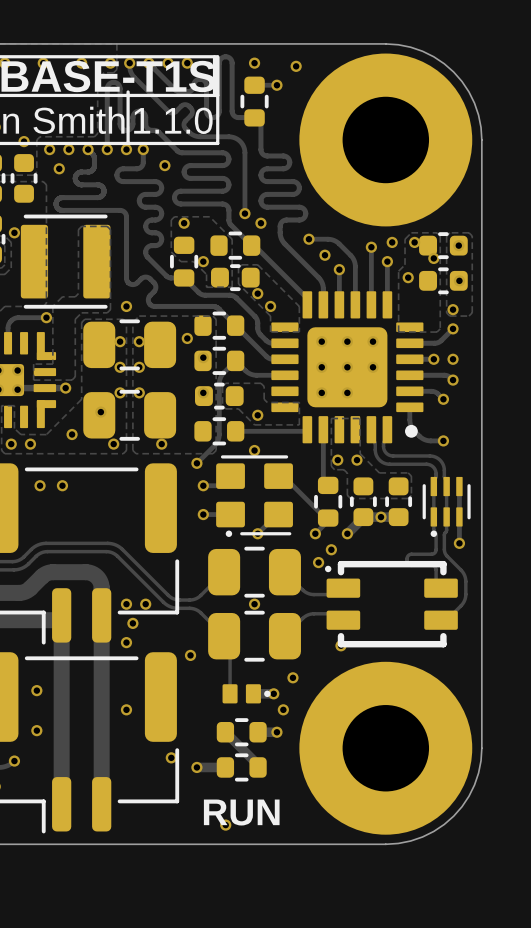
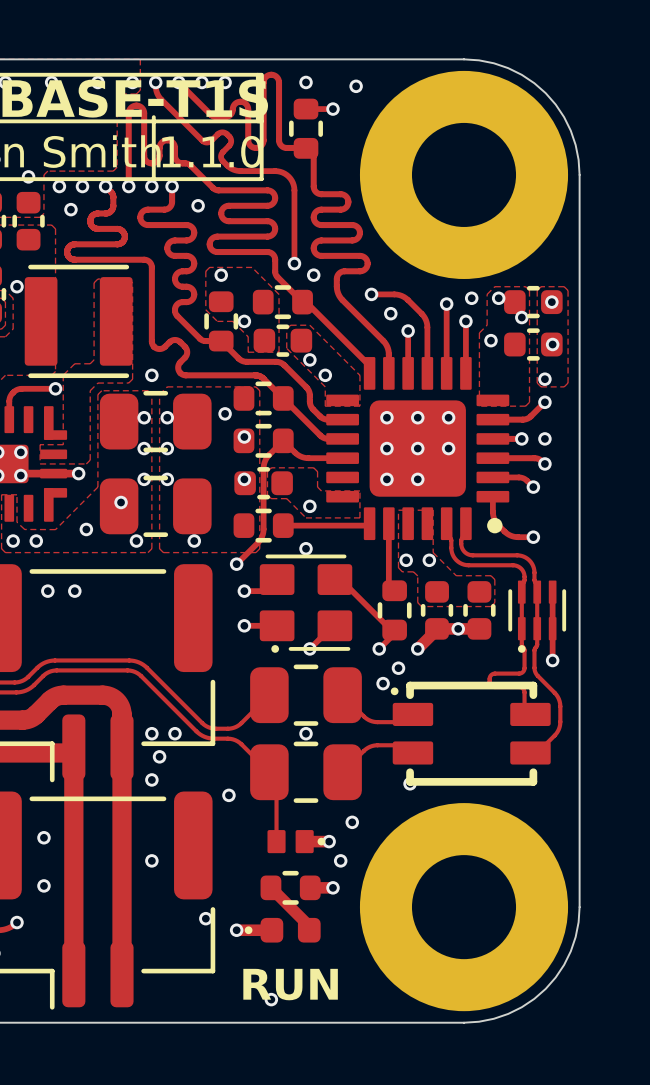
part footprint: [216, 753, 267, 782] -> [244, 917, 321, 943]

